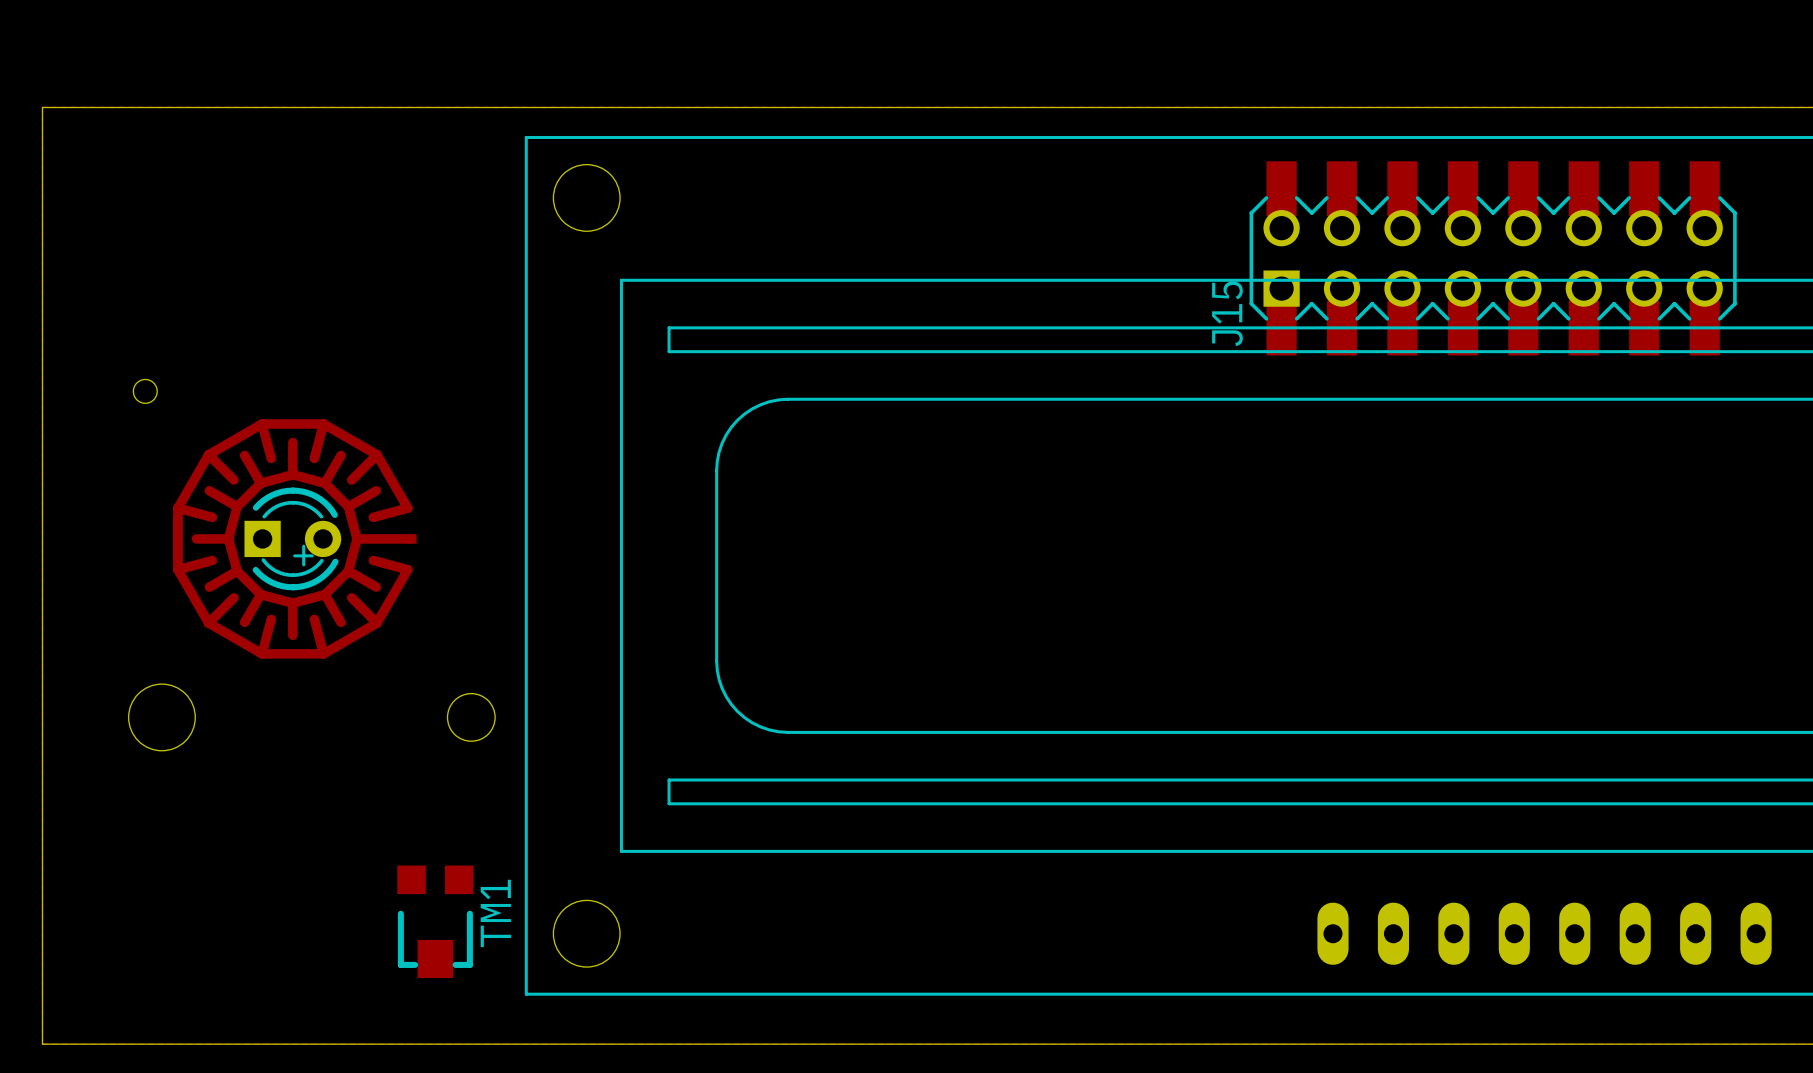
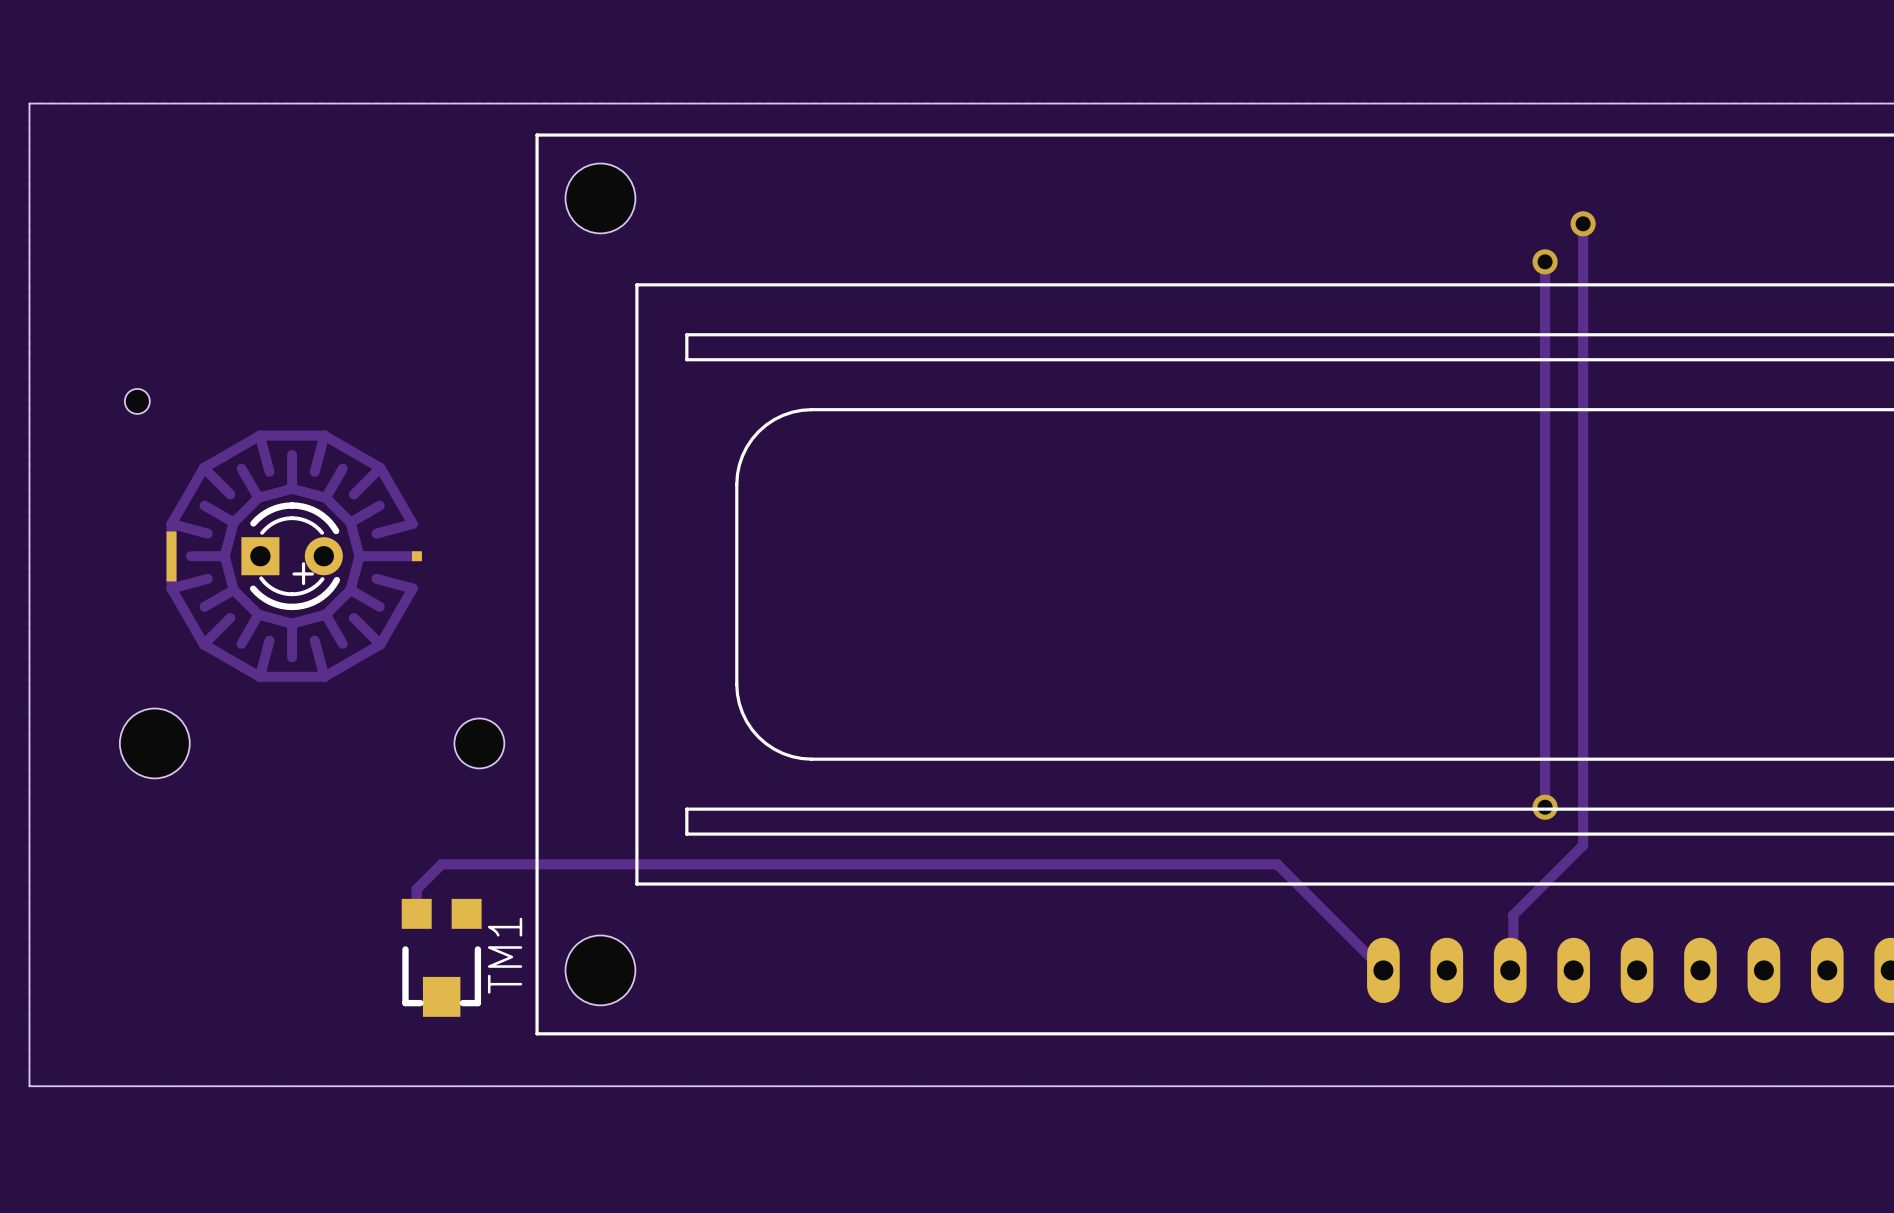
track: none -> (1583, 223) (1583, 845) (1513, 915) (1513, 967) (1510, 970) (1513, 965)
via: none -> (1583, 223)
track: none -> (1545, 261) (1545, 807)
via: none -> (1545, 261)
J15: (1493, 258) -> none
via: none -> (1545, 807)
track: none -> (416, 913) (416, 889) (441, 864) (1277, 864) (1383, 970)

